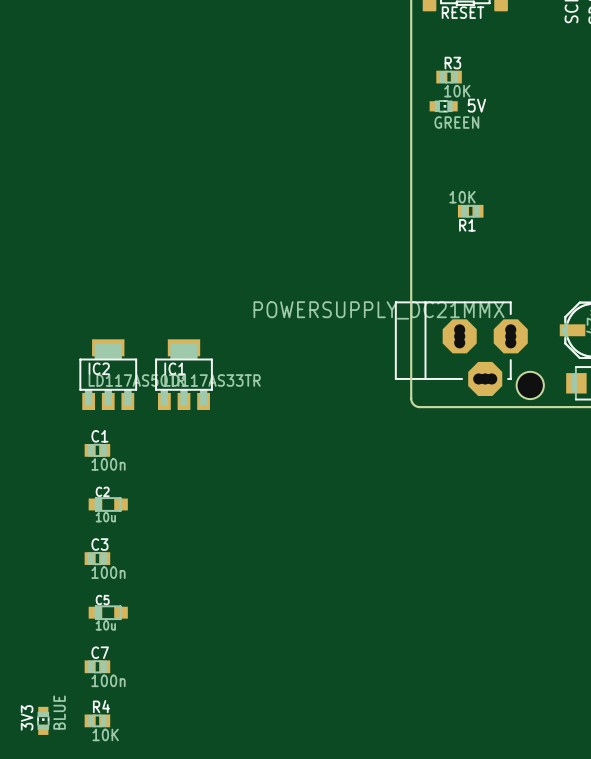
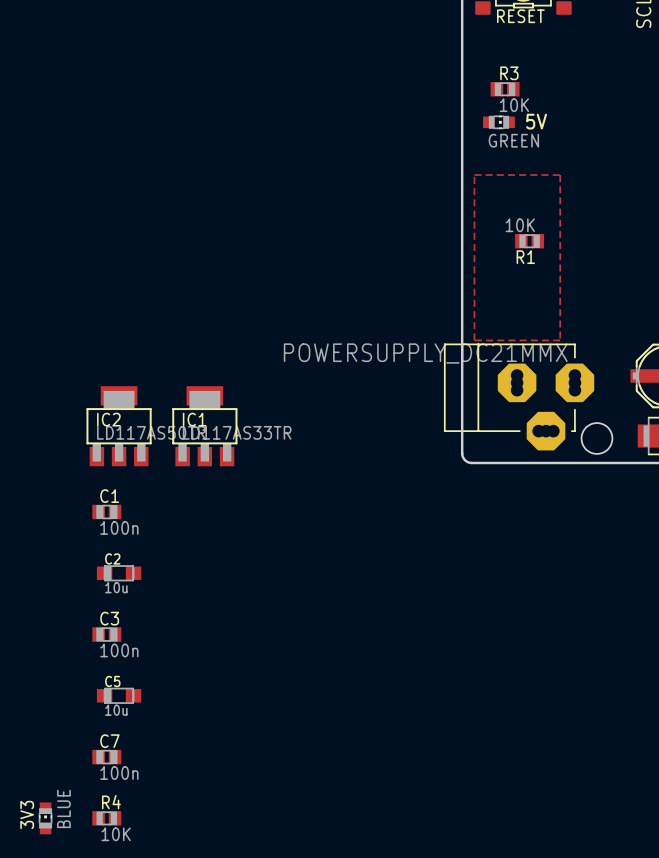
zone outline: none -> (474, 175) (474, 340) (560, 340) (560, 175) (474, 175)

